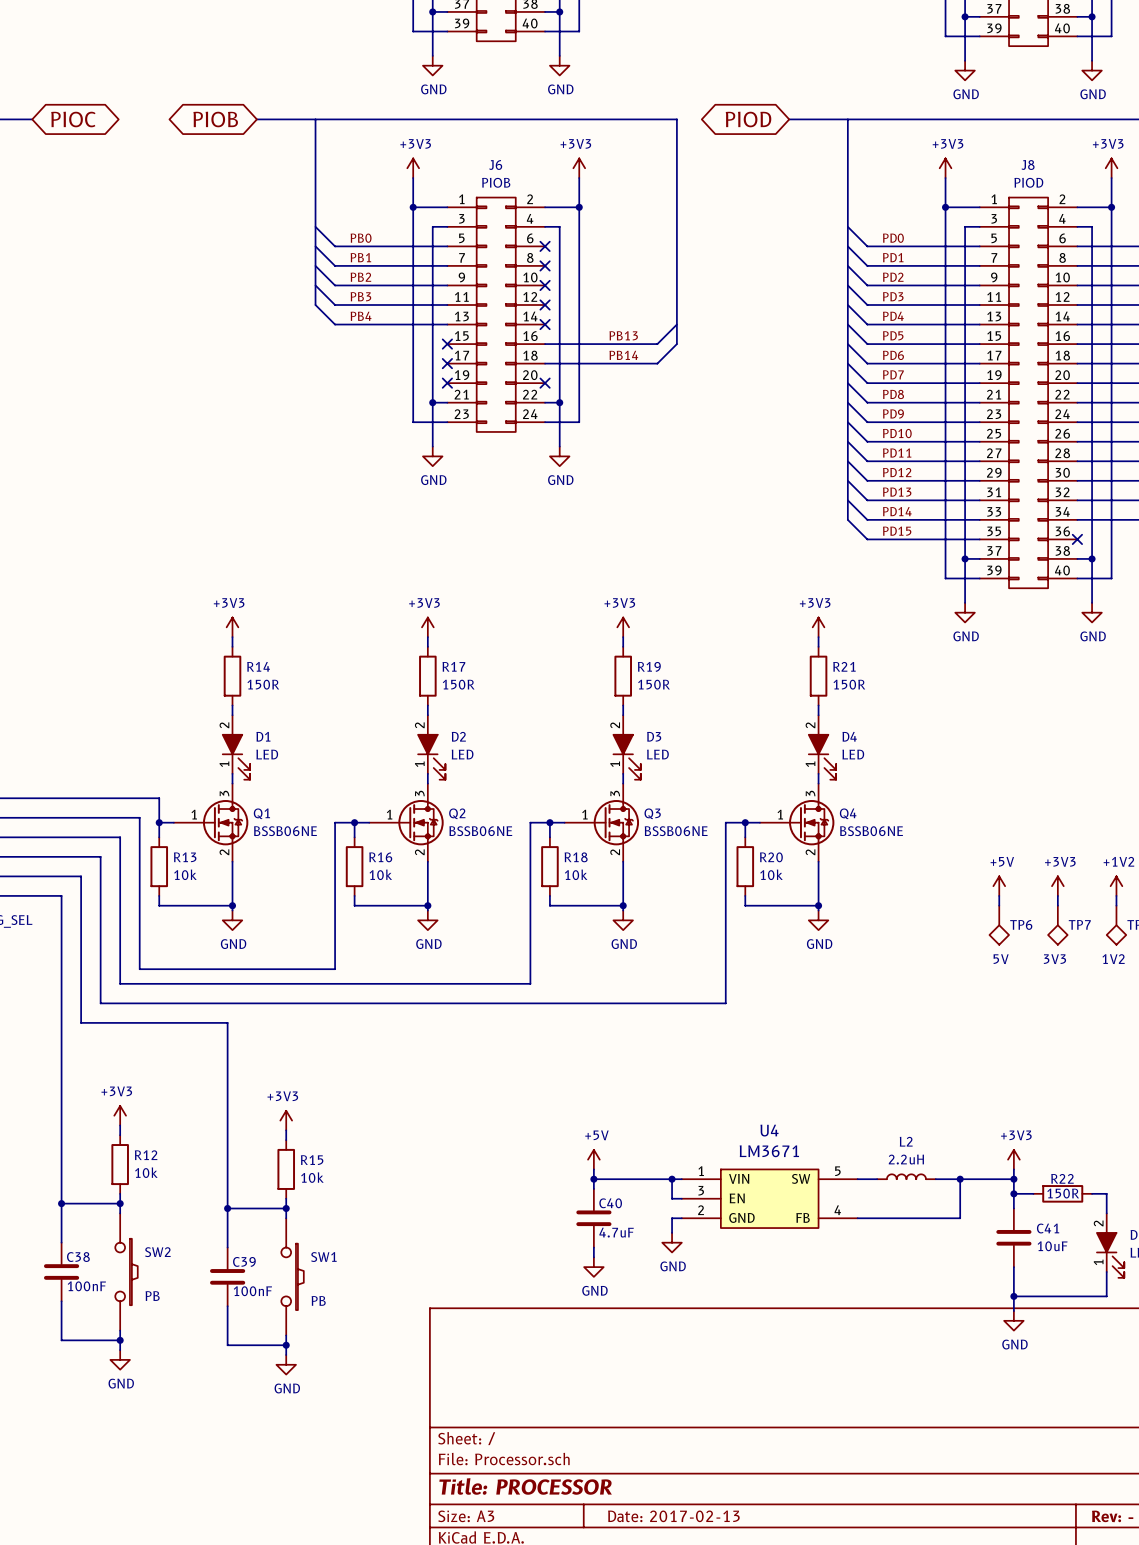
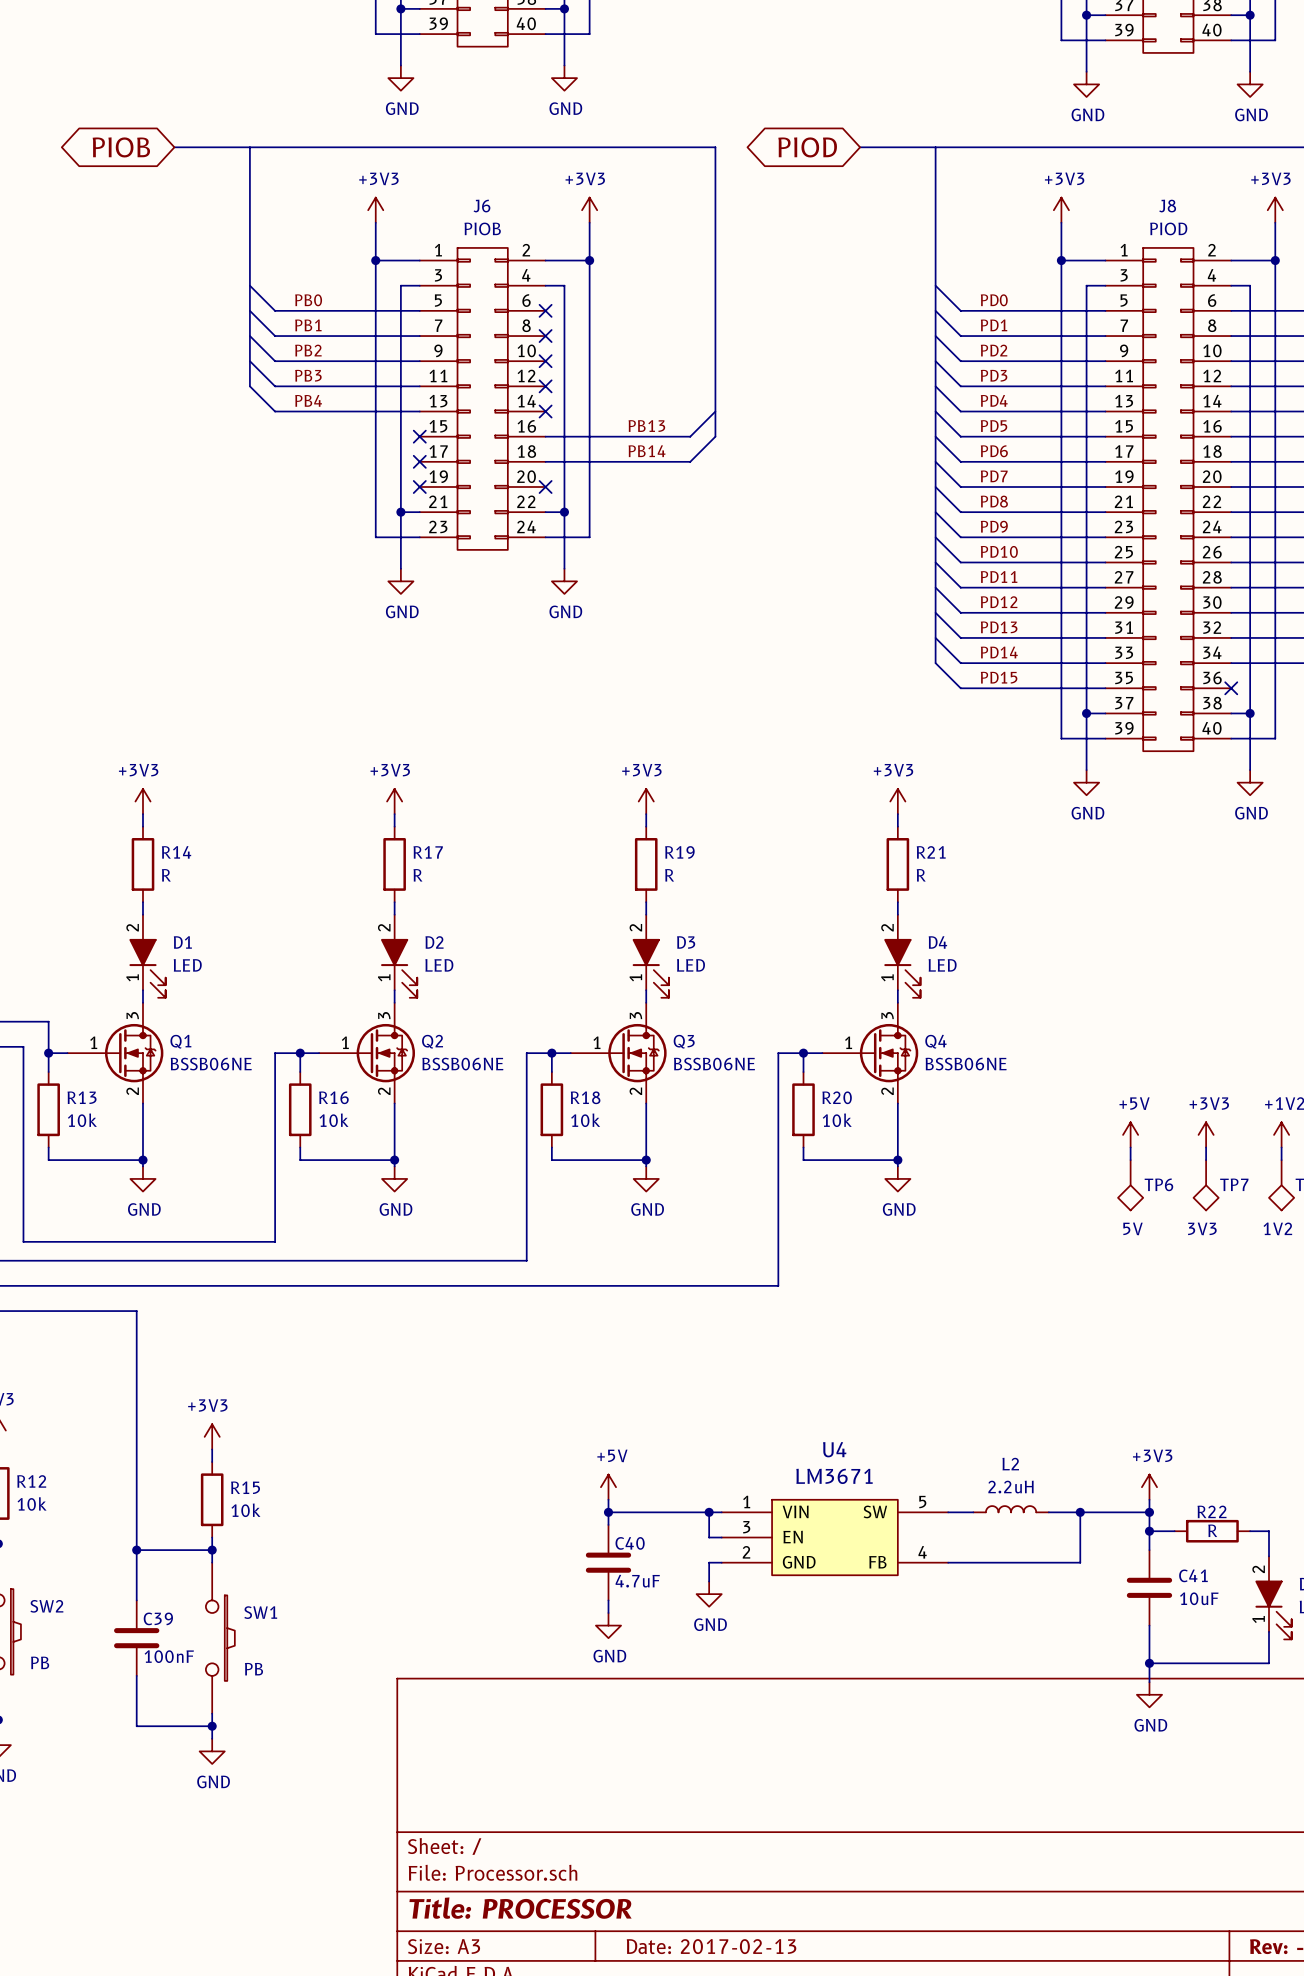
R14 value: 150R (263, 684) -> R (166, 875)
R17 value: 150R (458, 684) -> R (417, 875)
R19 value: 150R (654, 684) -> R (669, 875)
R21 value: 150R (849, 684) -> R (921, 875)
R22 value: 150R (1063, 1193) -> R (1212, 1530)

